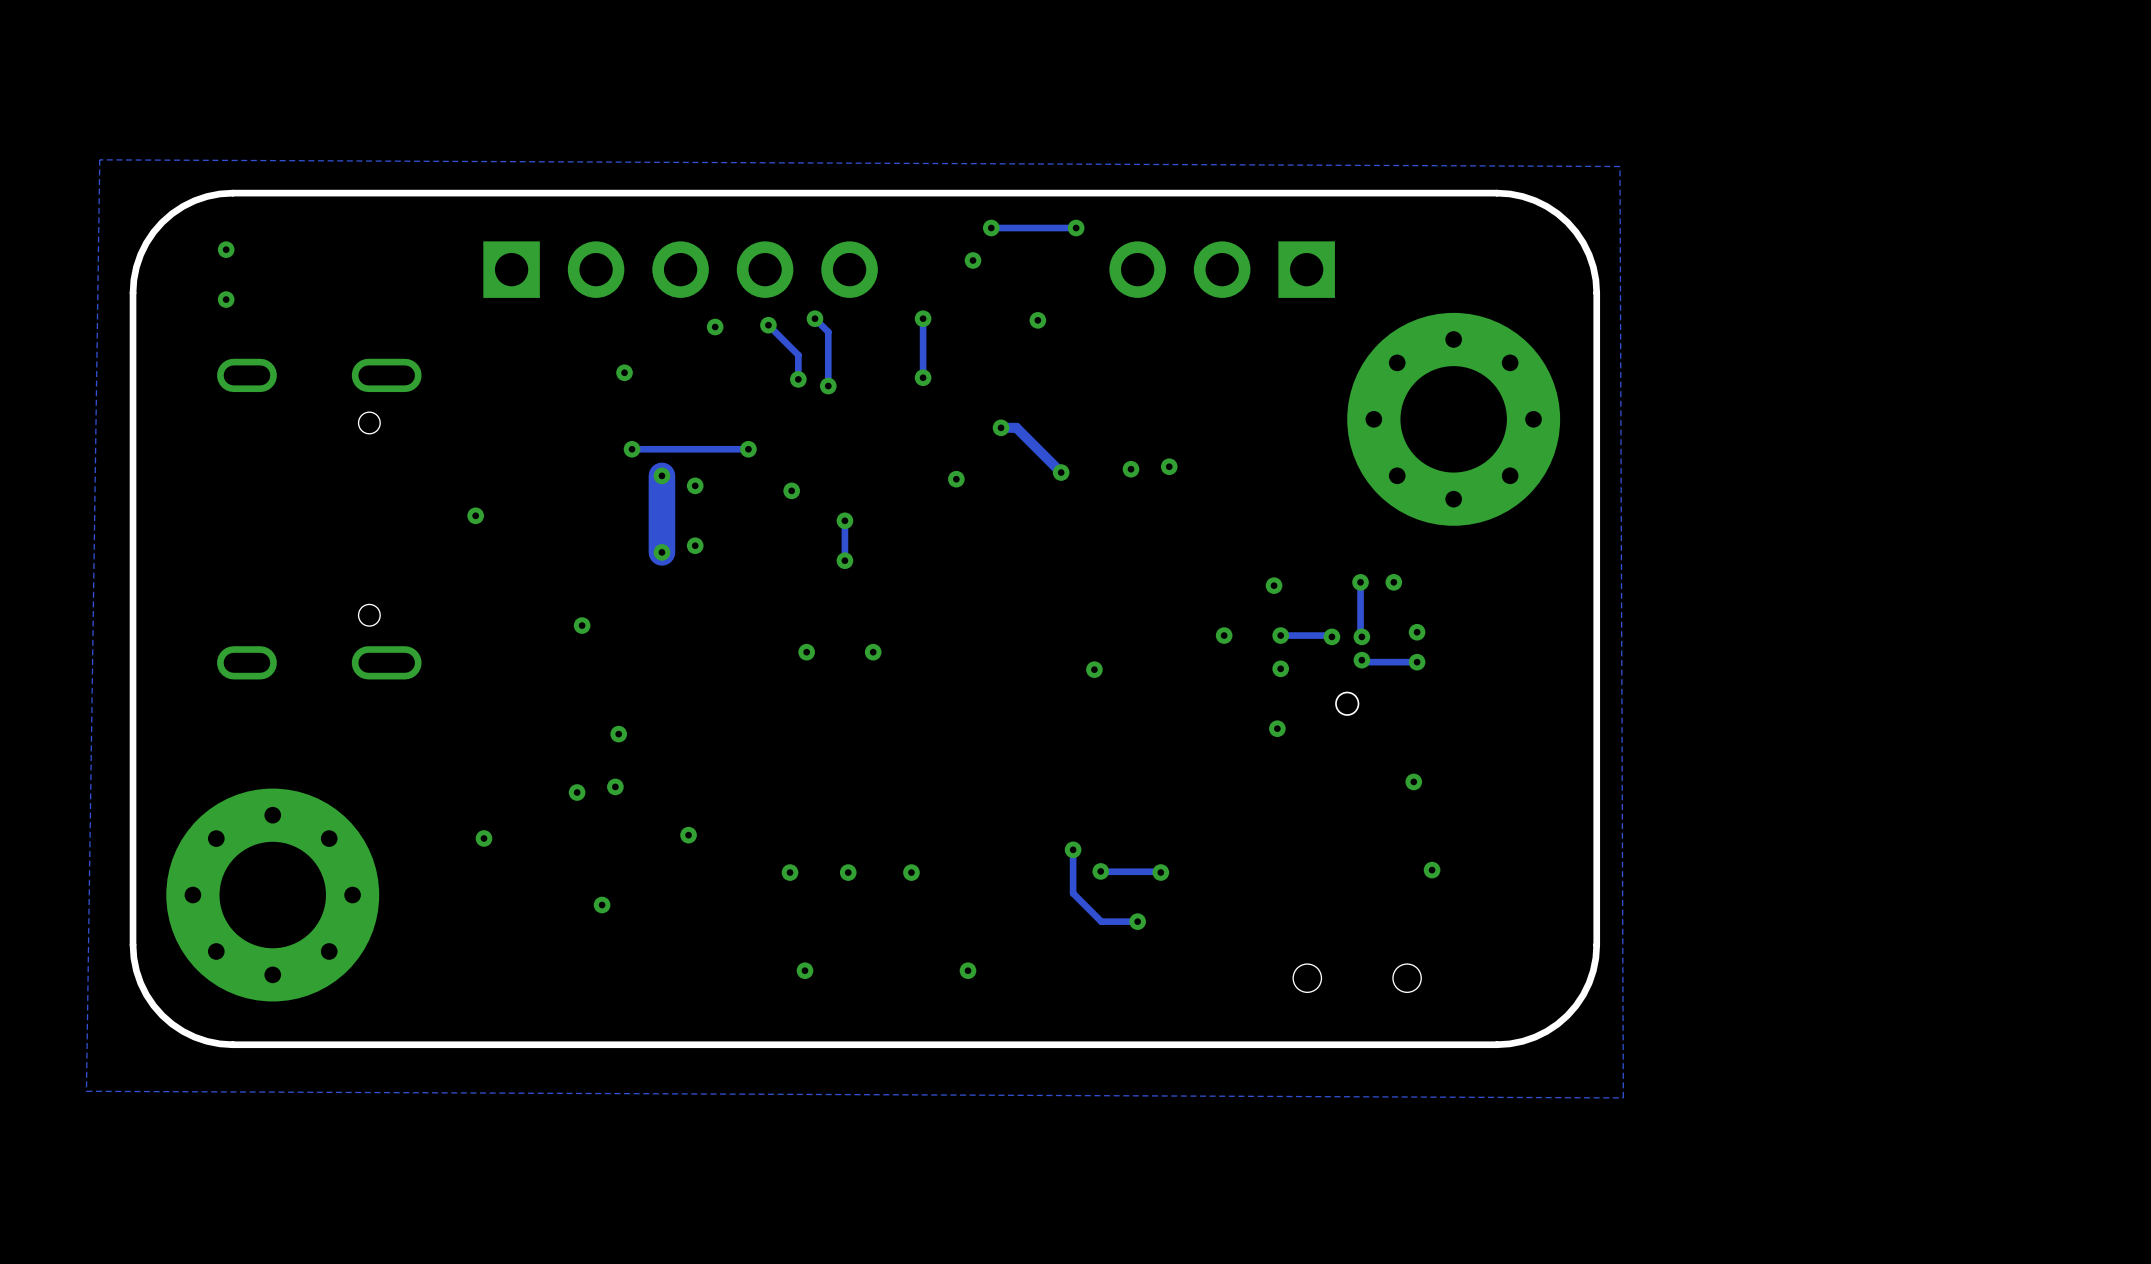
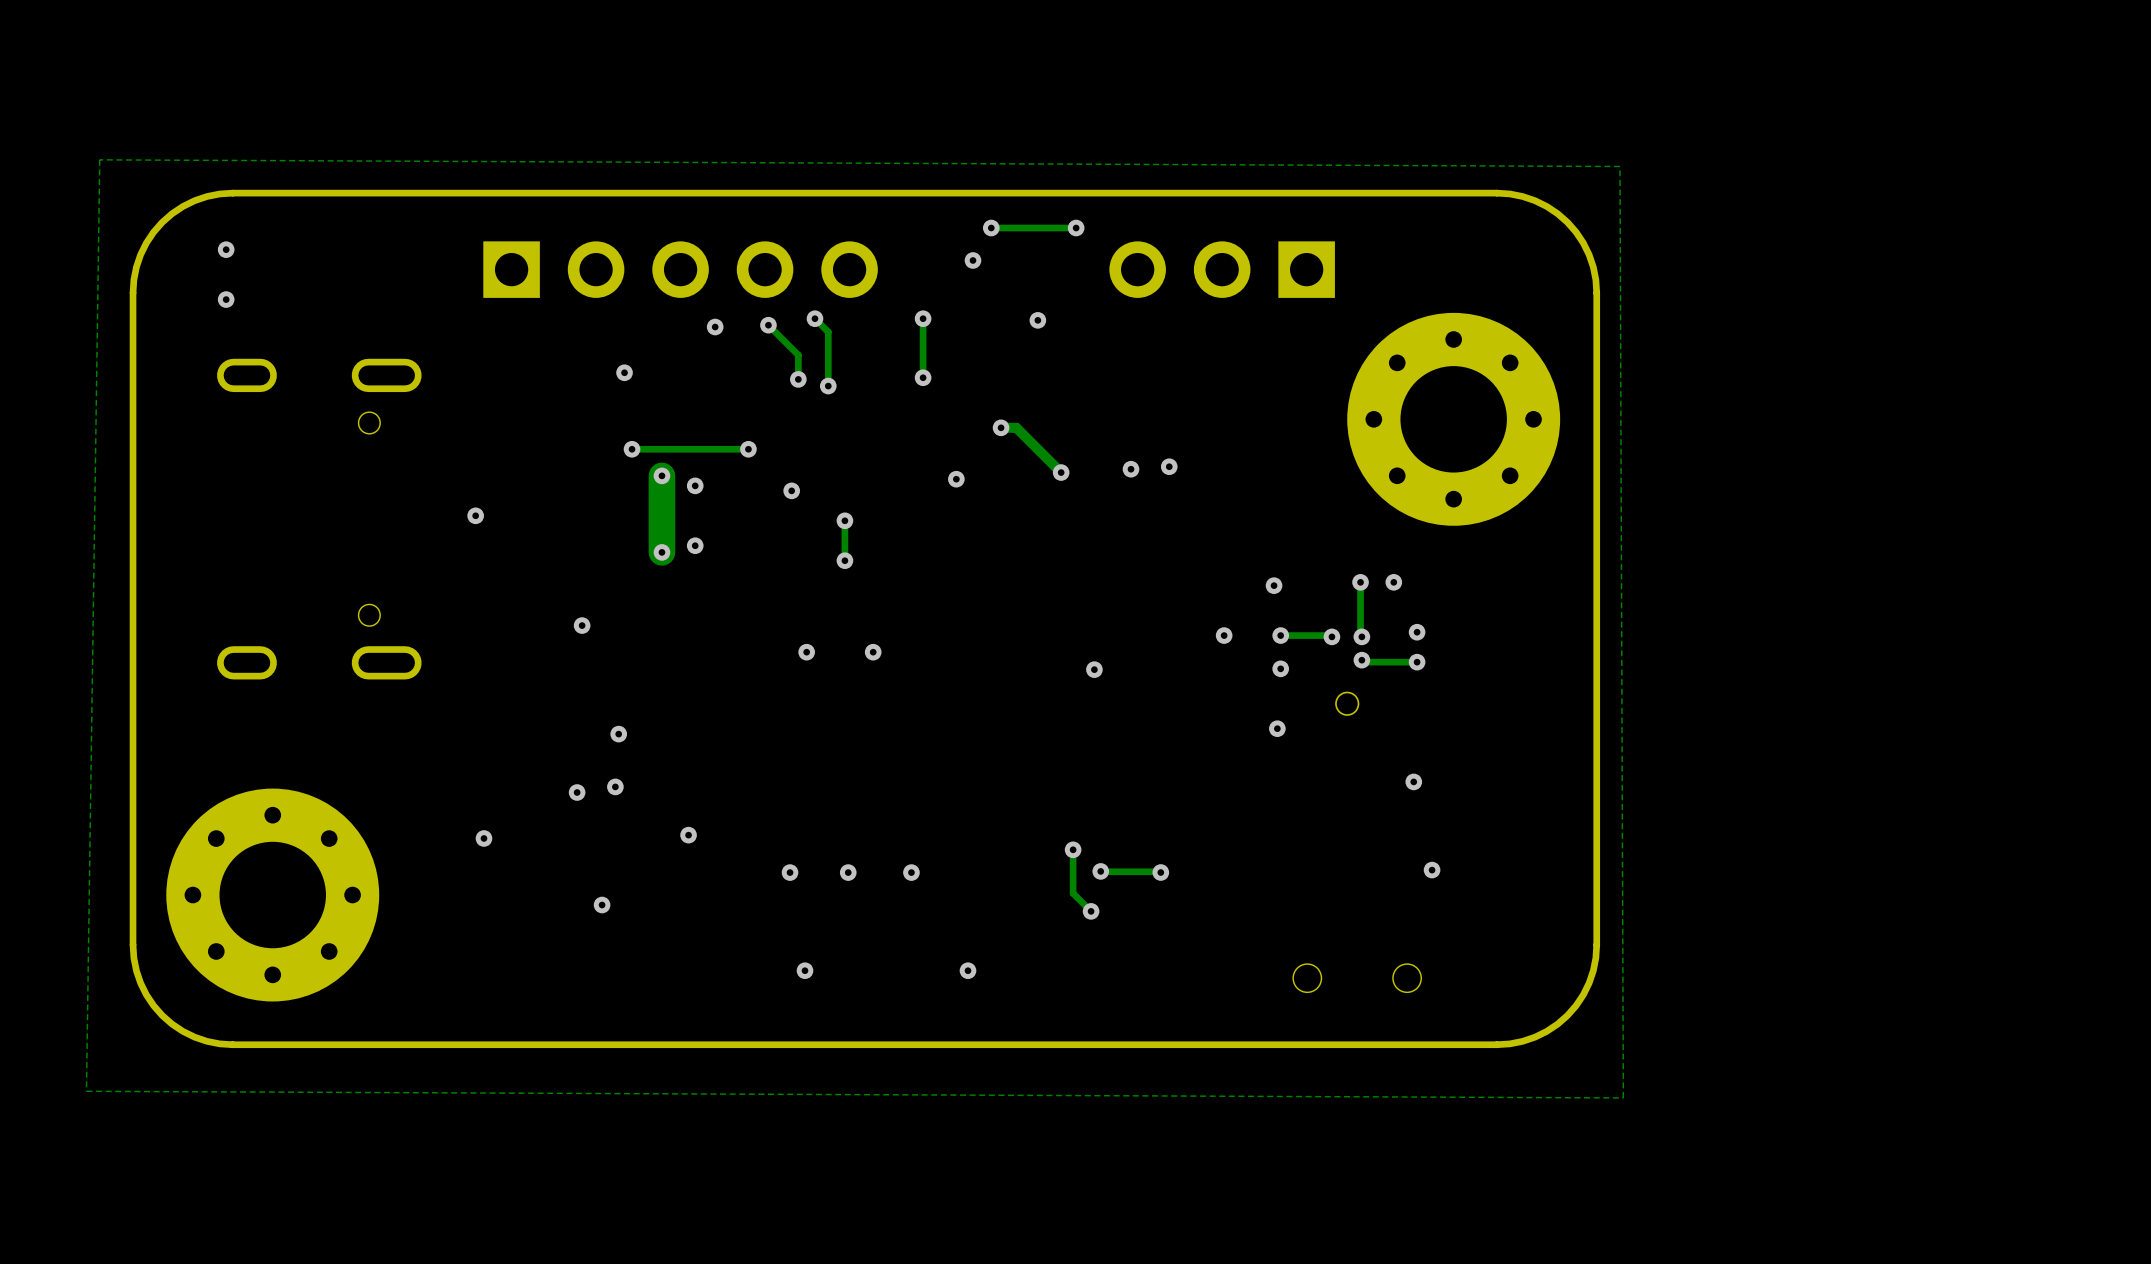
track: (1091, 911) (1101, 921) (1137, 921) -> none
via position: (1137, 921) -> (1091, 911)

